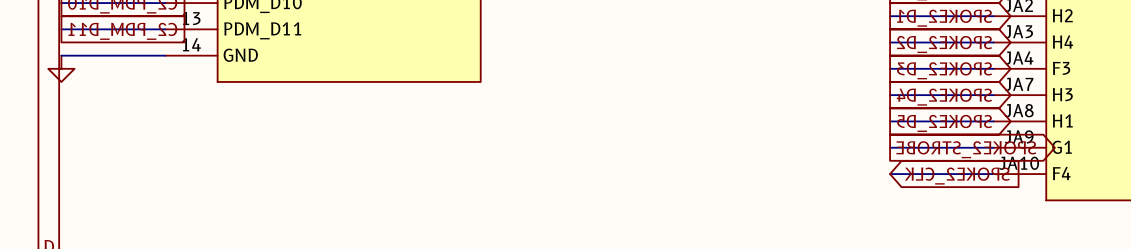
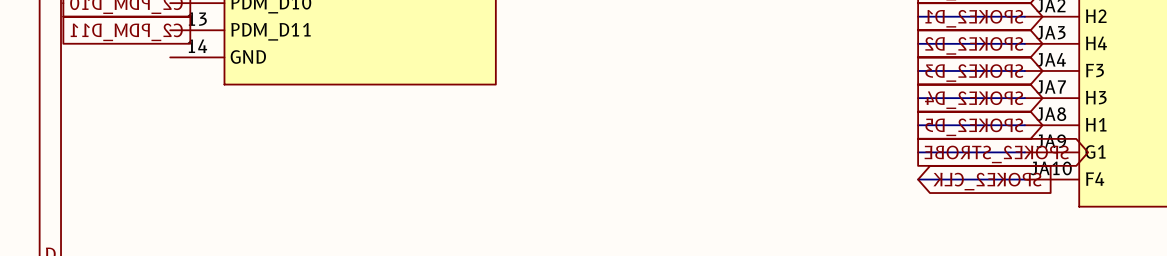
wire: (61, 3) (165, 3) -> none
wire: (61, 29) (165, 29) -> none
wire: (61, 55) (165, 55) -> none
power symbol: (61, 68) -> none

